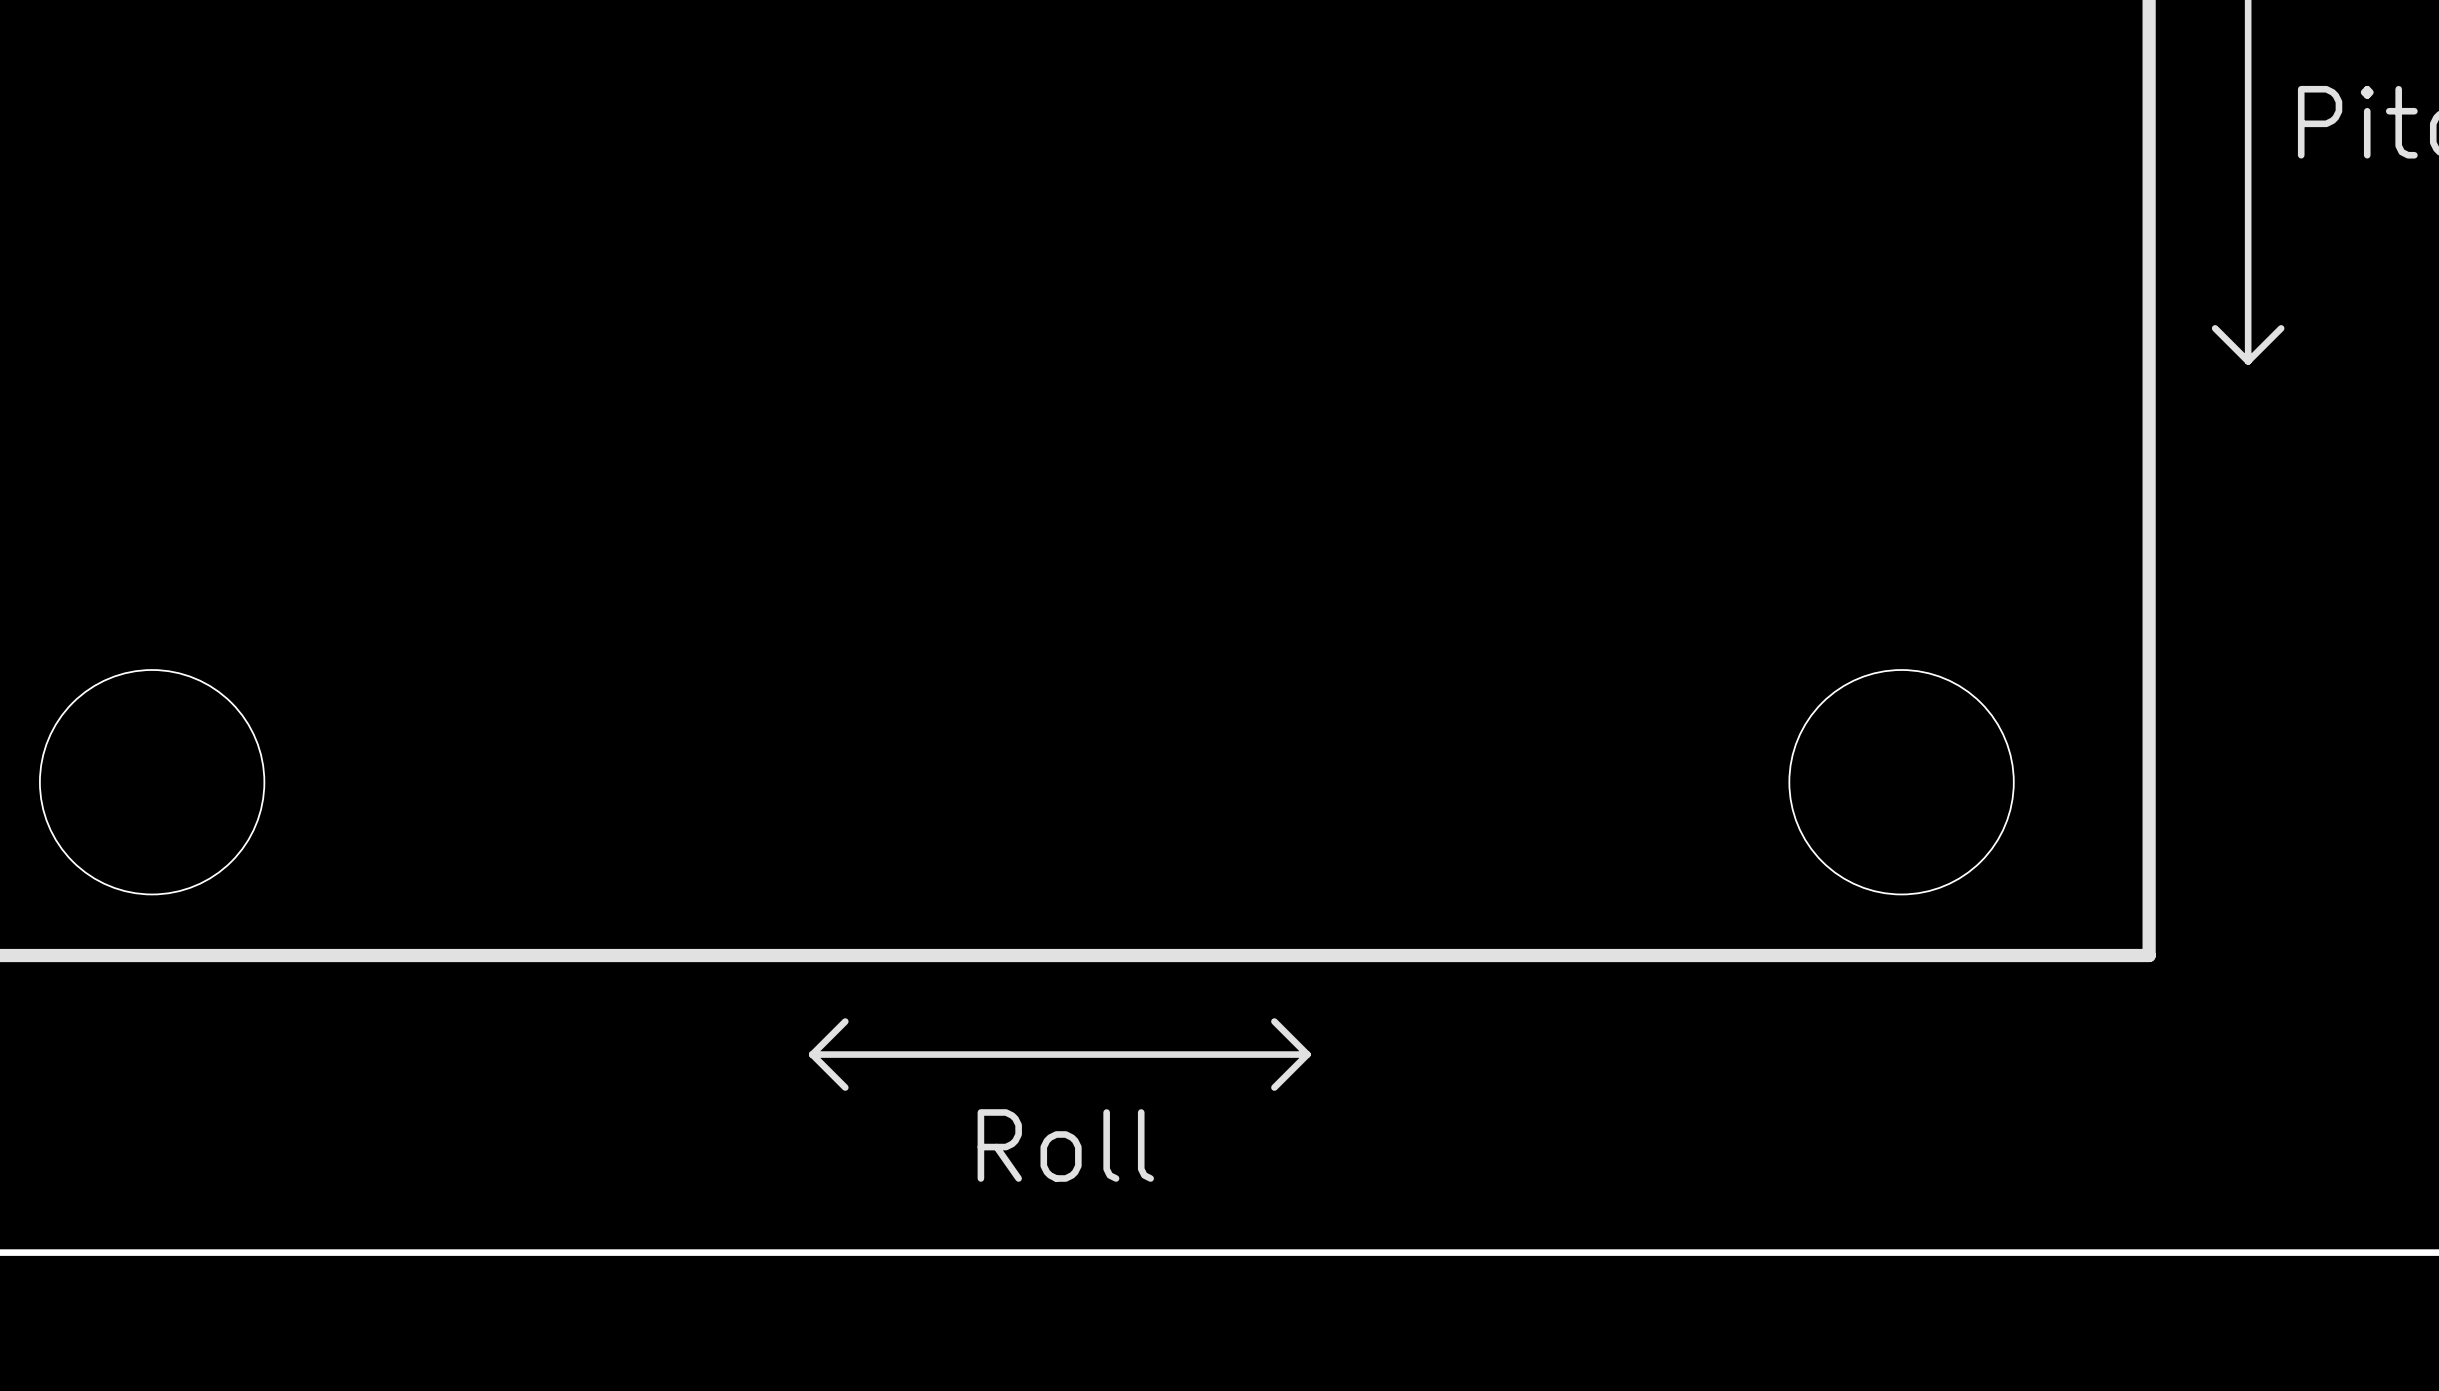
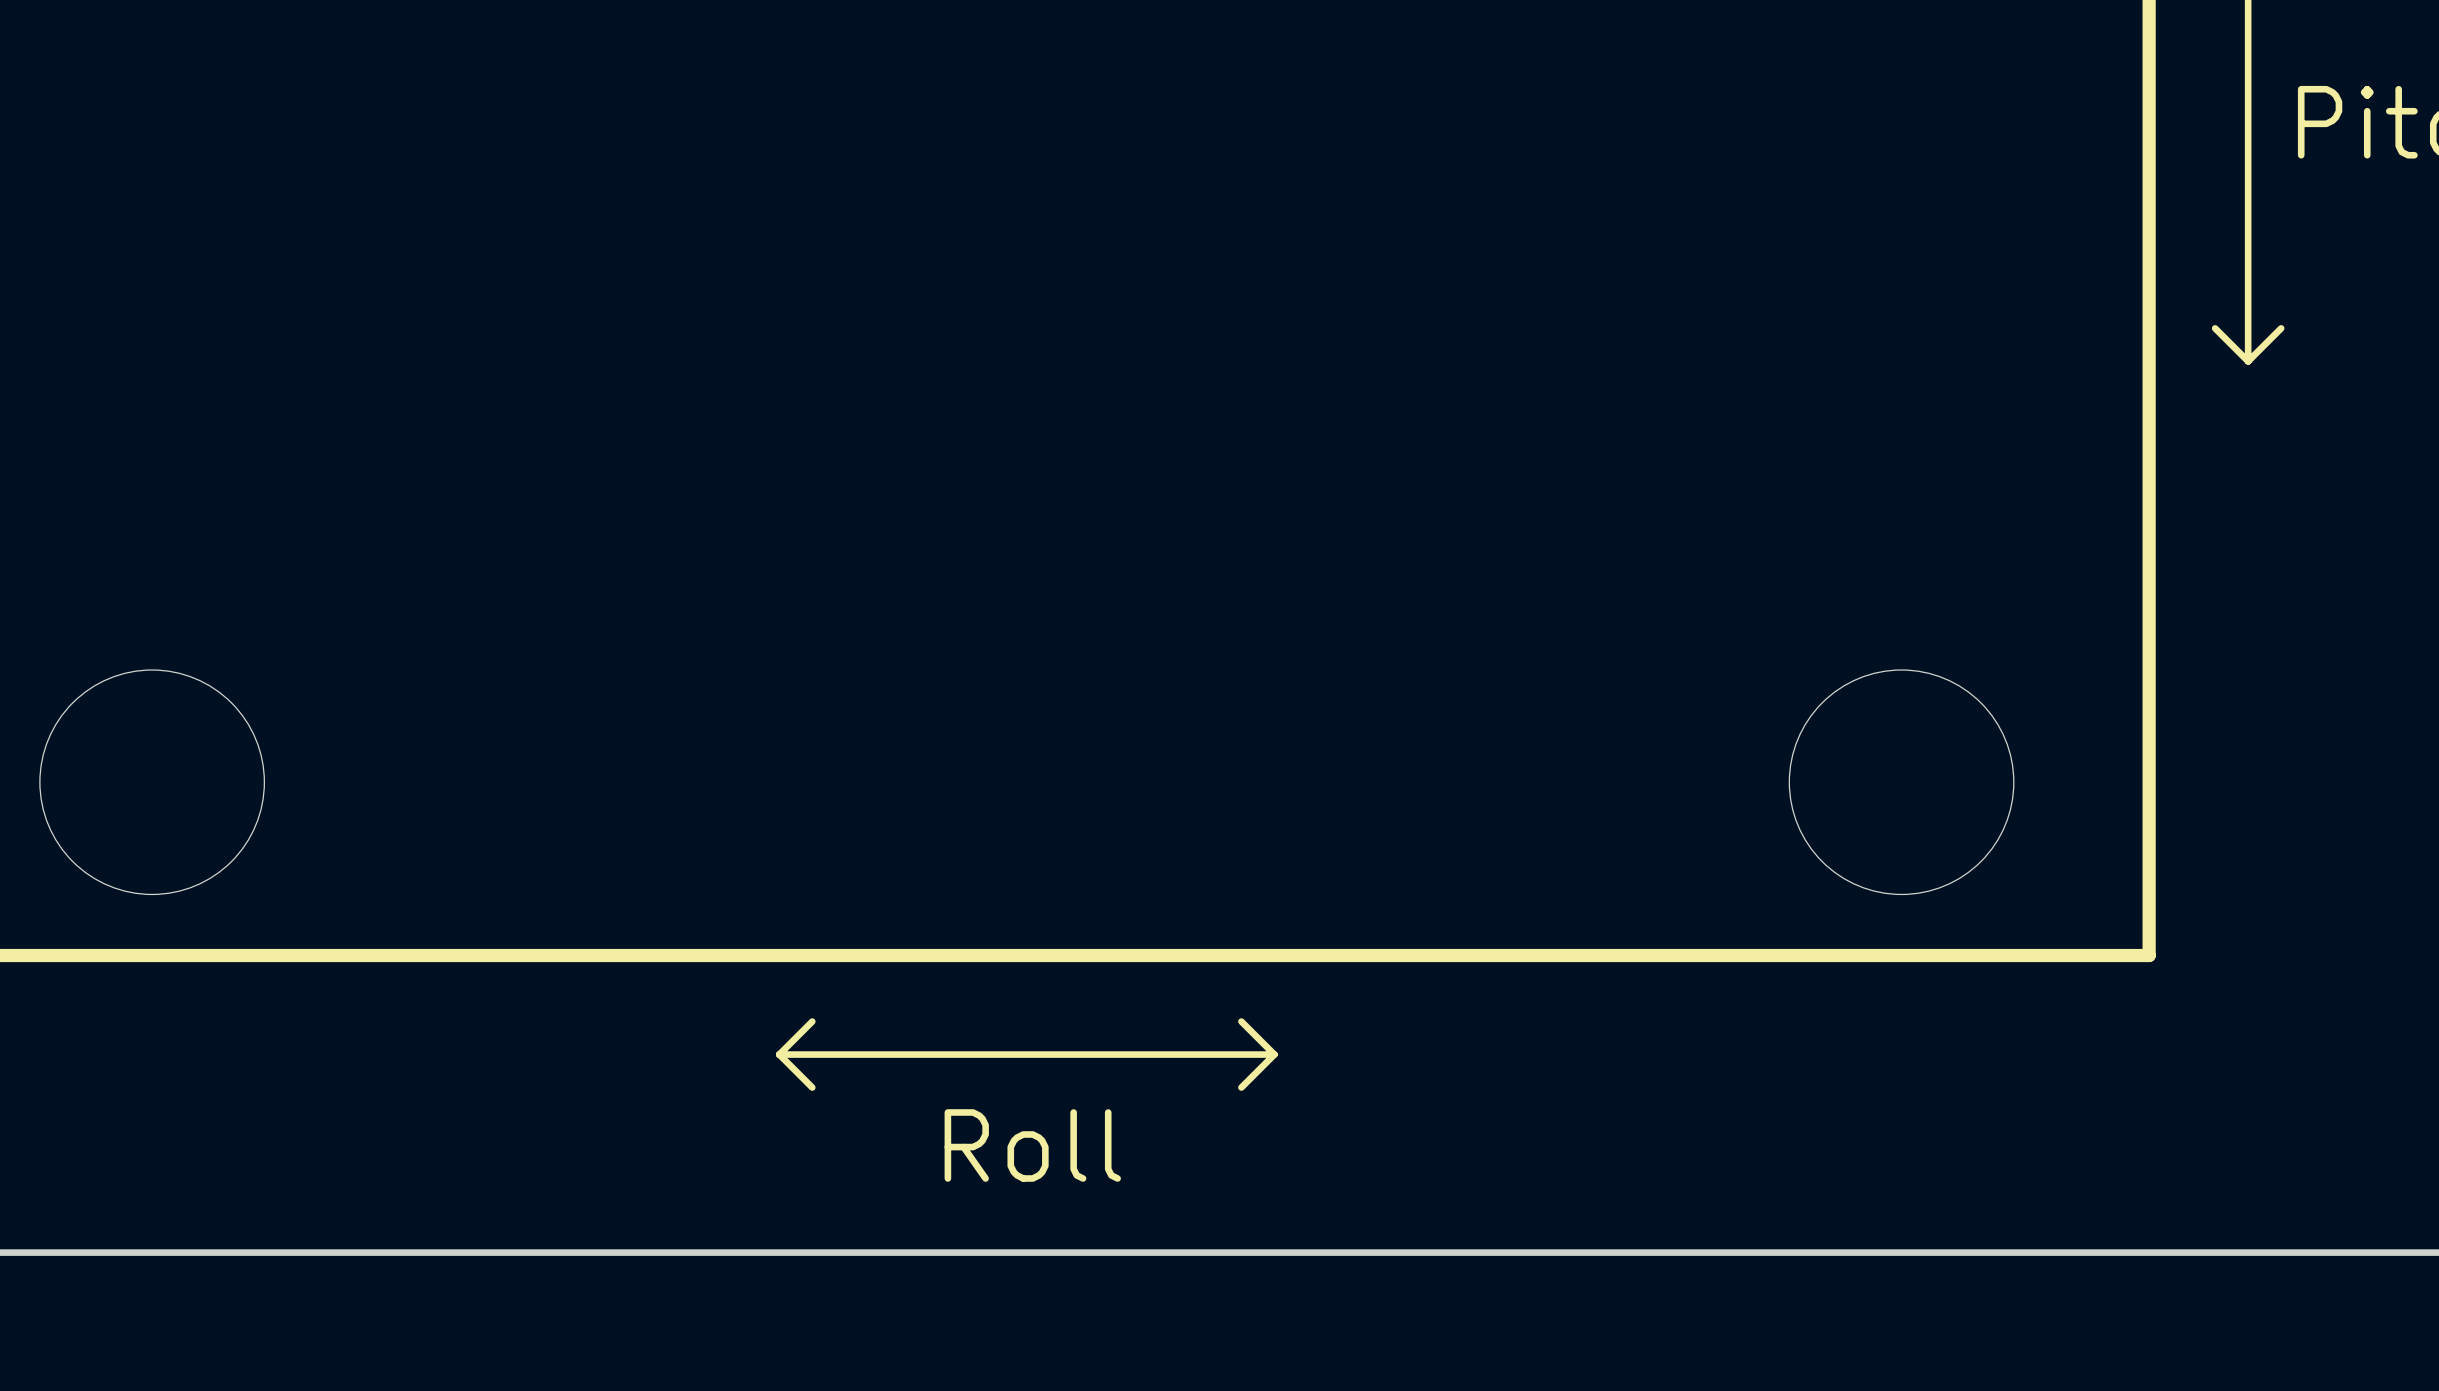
line: (845, 1021) (812, 1054) (845, 1087) -> none
line: none -> (1241, 1021) (1274, 1054) (1241, 1087)
line: (1274, 1021) (1307, 1054) -> (779, 1054) (812, 1087)
line: (1274, 1054) (1307, 1054) -> (779, 1054) (812, 1054)
line: (1307, 1054) (1274, 1087) -> (812, 1021) (779, 1054)
text position: Roll (1065, 1145) -> Roll (1032, 1145)

